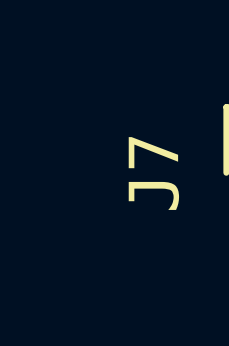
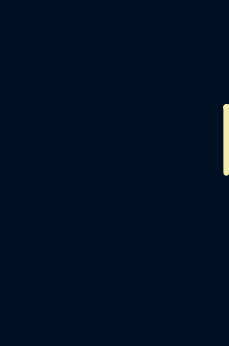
J7 name: J7 (153, 173) -> none

